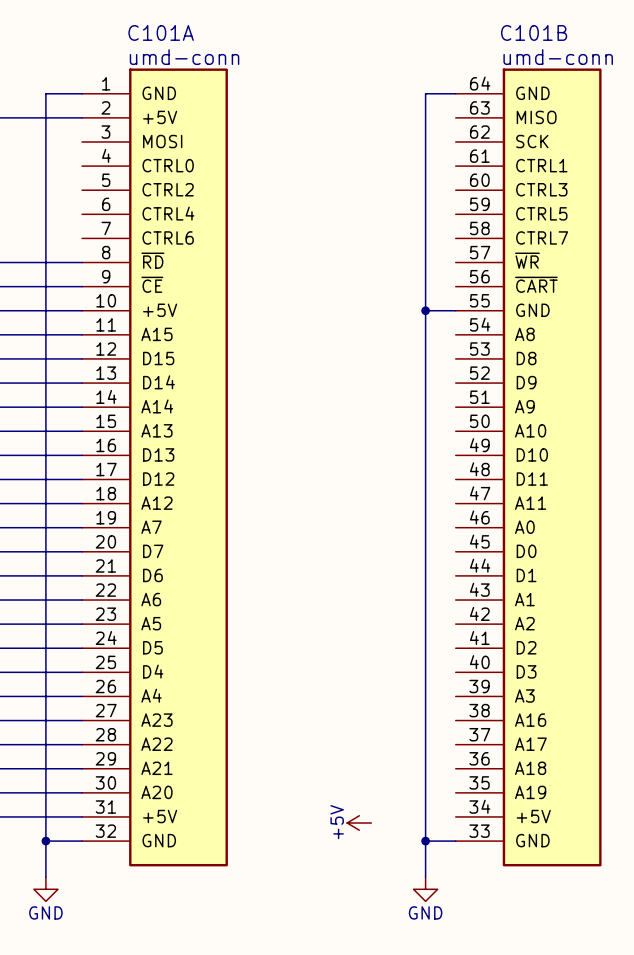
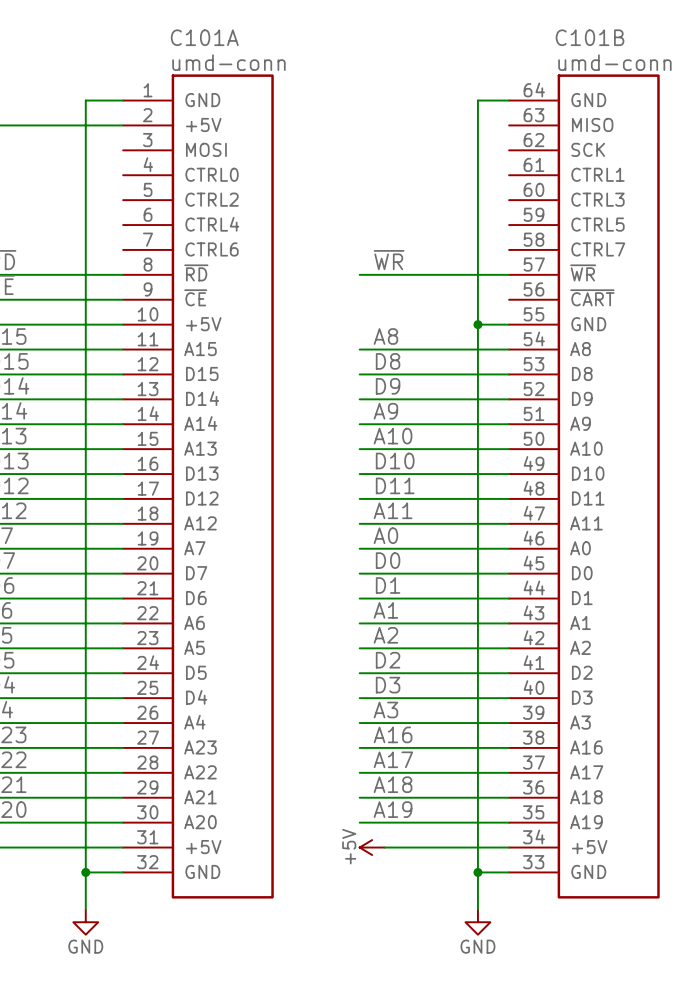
label: none -> ~{WR} (389, 260)
wire: none -> (359, 274) (509, 274)
label: none -> A8 (385, 336)
wire: none -> (359, 349) (509, 349)
label: none -> D8 (388, 361)
wire: none -> (359, 374) (509, 374)
label: none -> D9 (388, 386)
wire: none -> (359, 399) (509, 399)
label: none -> A9 (385, 411)
wire: none -> (359, 424) (509, 424)
label: none -> A10 (393, 436)
wire: none -> (359, 449) (509, 449)
label: none -> D10 (395, 461)
wire: none -> (359, 474) (509, 474)
label: none -> D11 (395, 485)
wire: none -> (359, 498) (509, 498)
label: none -> A11 (393, 510)
wire: none -> (359, 523) (509, 523)
label: none -> A0 (385, 535)
wire: none -> (359, 548) (509, 548)
label: none -> D0 (388, 560)
wire: none -> (359, 573) (509, 573)
label: none -> D1 (388, 585)
wire: none -> (359, 598) (509, 598)
label: none -> A1 (385, 610)
wire: none -> (359, 623) (509, 623)
label: none -> A2 (385, 635)
wire: none -> (359, 648) (509, 648)
label: none -> D2 (388, 660)
wire: none -> (359, 673) (509, 673)
label: none -> D3 (388, 685)
wire: none -> (359, 698) (509, 698)
label: none -> A3 (385, 710)
wire: none -> (359, 723) (509, 723)
label: none -> A16 (393, 734)
wire: none -> (359, 747) (509, 747)
label: none -> A17 (393, 759)
wire: none -> (359, 772) (509, 772)
label: none -> A18 (393, 784)
wire: none -> (359, 797) (509, 797)
label: none -> A19 (393, 809)
wire: none -> (359, 822) (509, 822)
wire: none -> (384, 847) (509, 847)
power symbol position: +5V (359, 823) -> +5V (372, 847)

